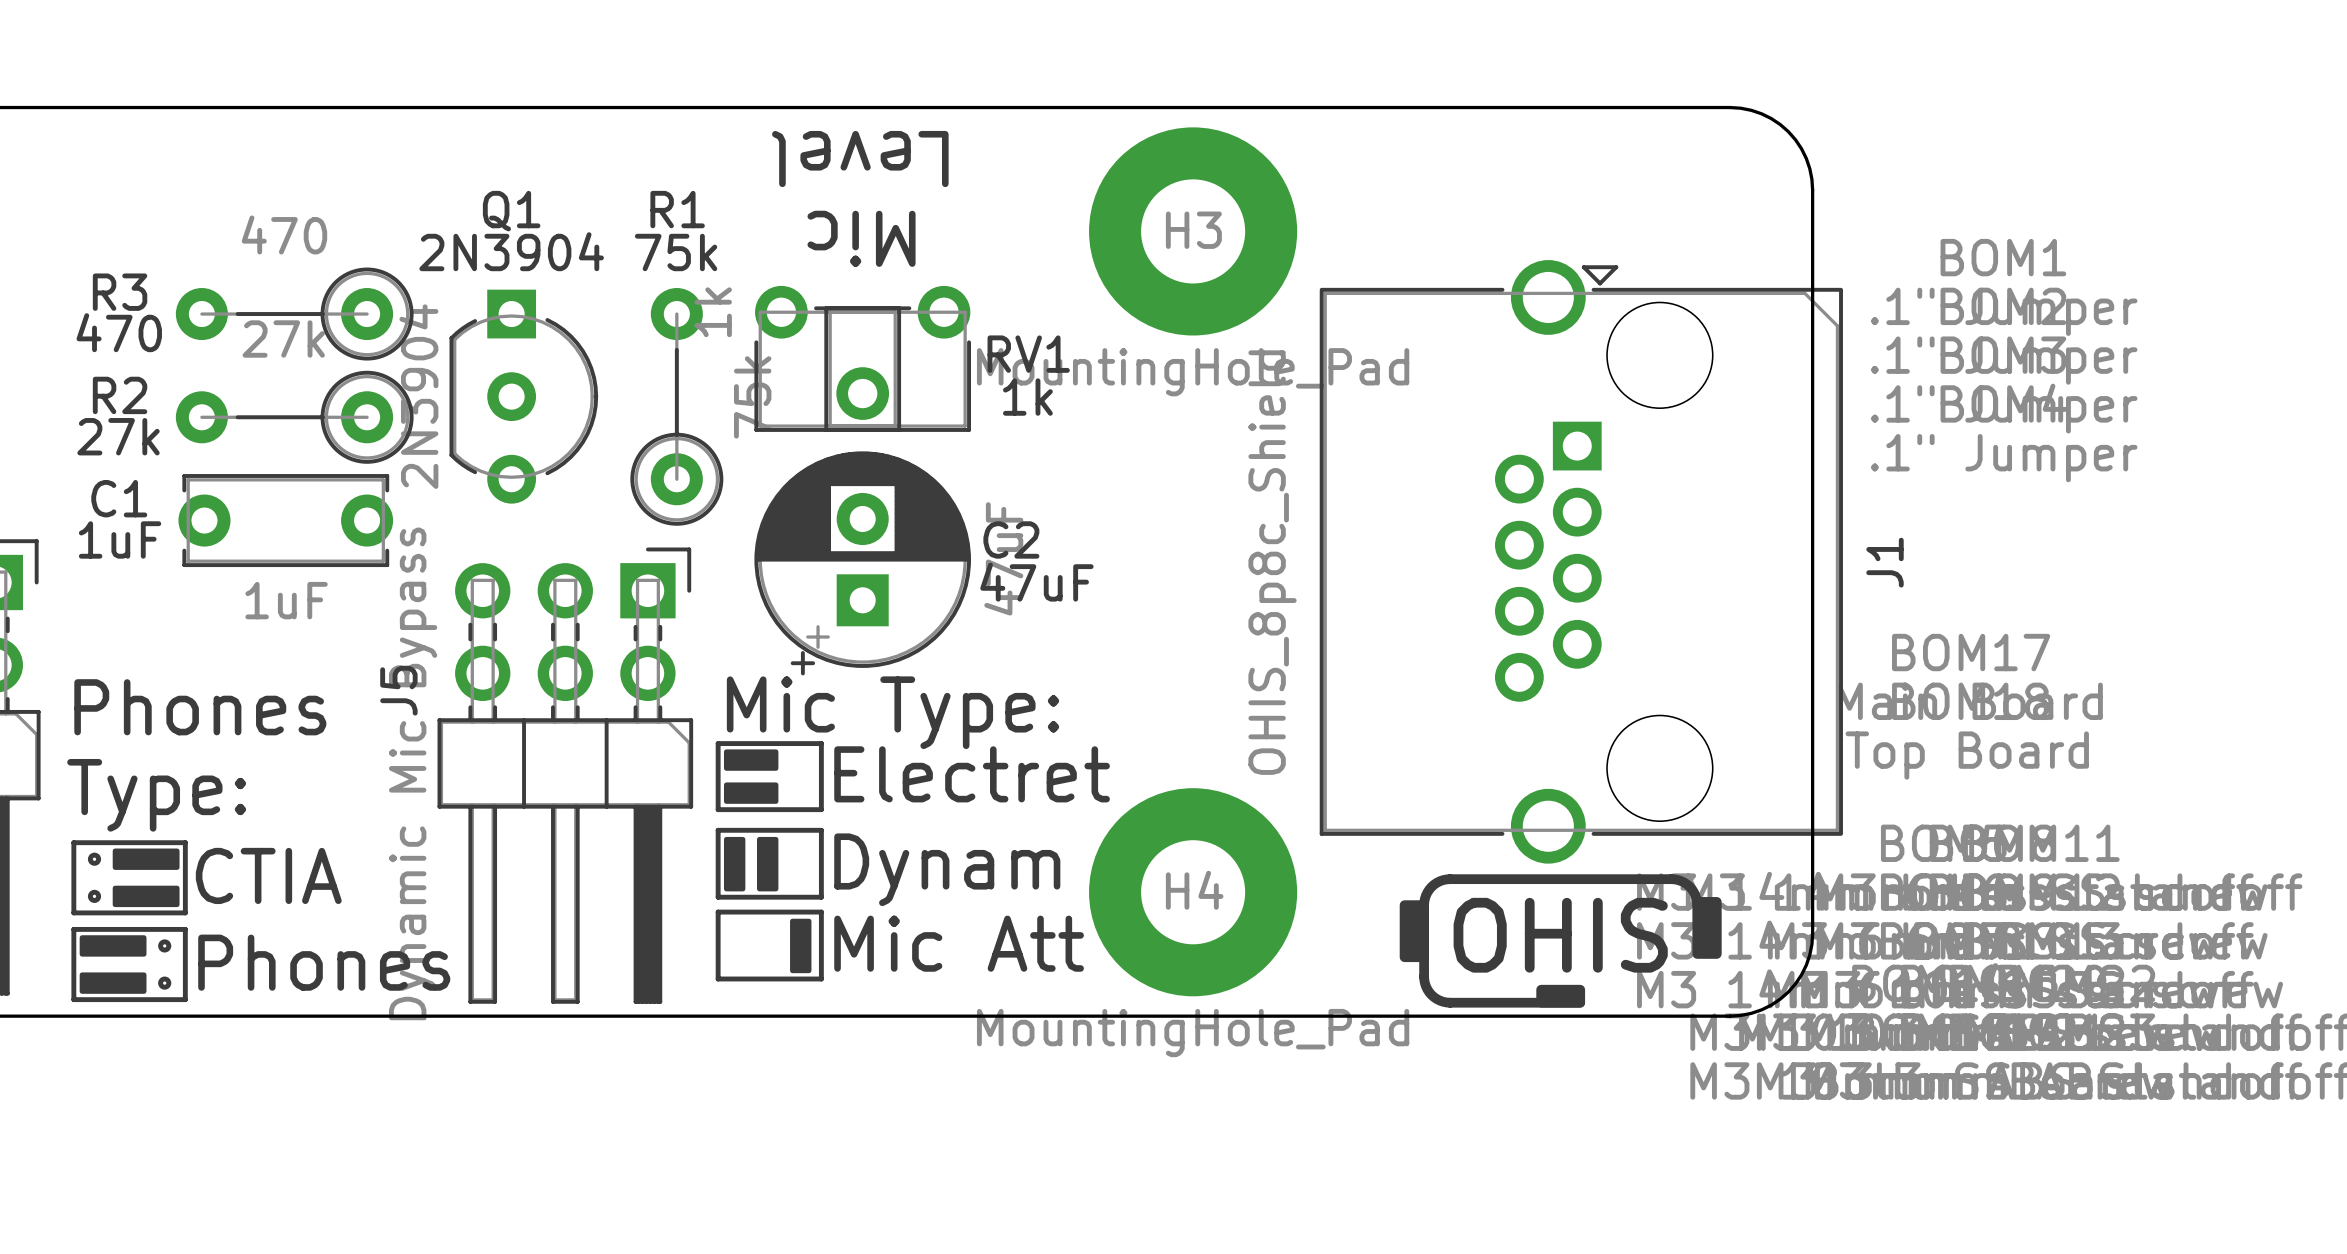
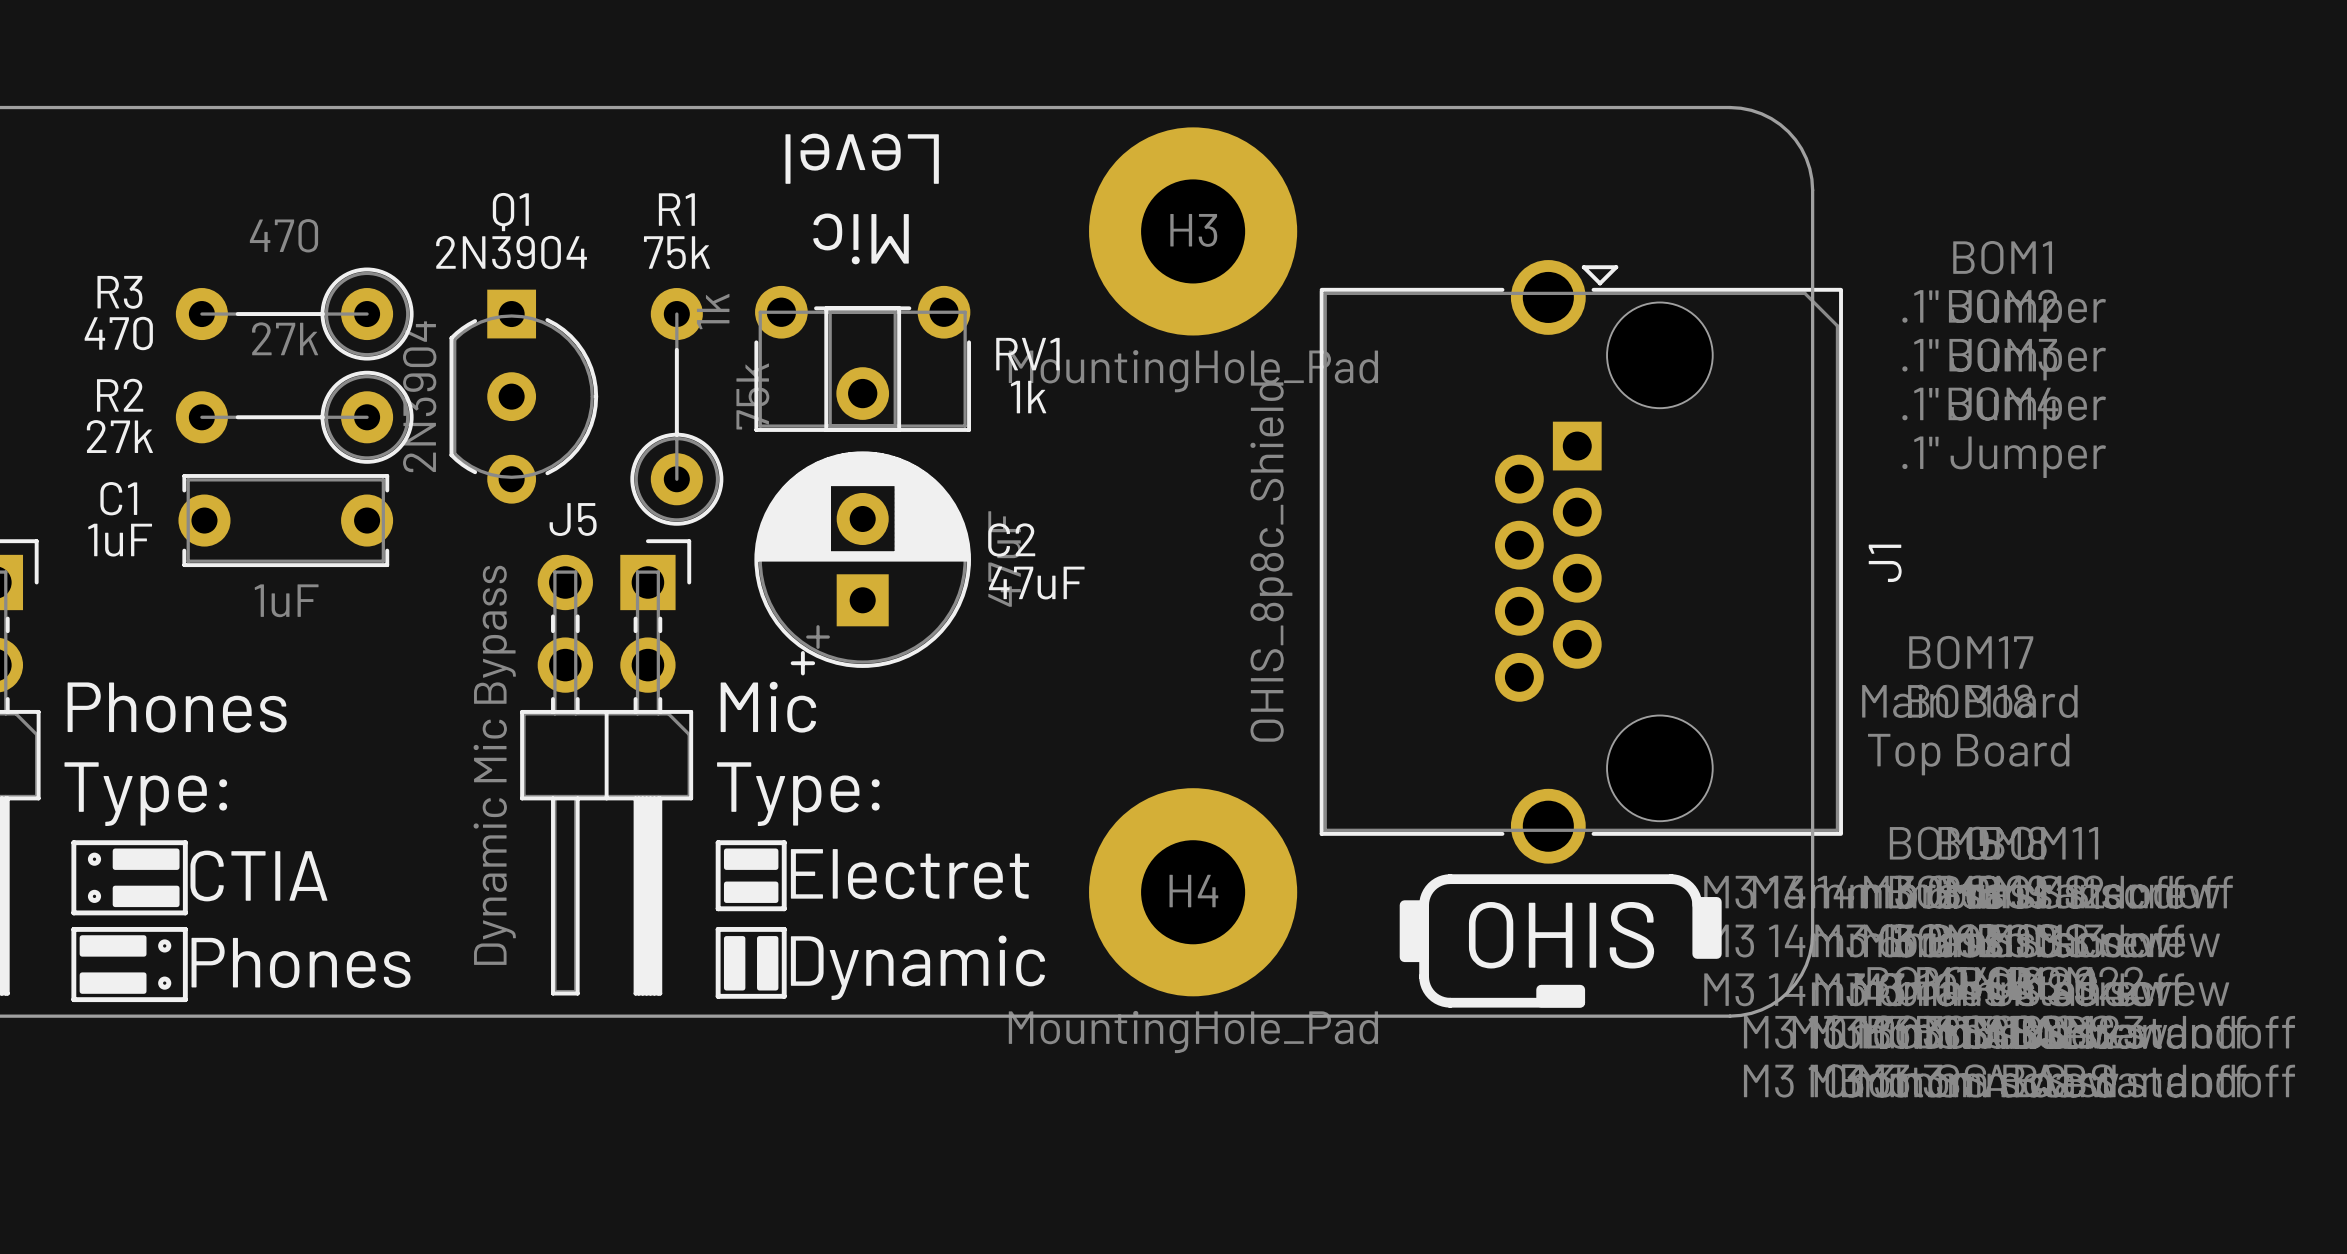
J5 footprint: [437, 547, 694, 1004] -> [520, 539, 694, 996]
J5 name position: J5 (398, 690) -> J5 (573, 519)
text: Mic Type: (893, 712) -> Mic (768, 707)
line: (718, 743) (718, 809) (821, 809) (821, 743) (718, 743) -> none
drawing: [723, 749, 812, 974] -> none
text position: Electret (972, 774) -> Electret (909, 874)
text: none -> Type: (798, 794)
line: (718, 842) (718, 830) (821, 830) (821, 897) (718, 897) -> (718, 842) (784, 842) (784, 908) (718, 908) (718, 897)
drawing: none -> [723, 848, 779, 991]
text: Dynam (947, 869) -> Dynamic (917, 967)
line: (718, 929) (718, 912) (821, 912) (821, 978) (718, 978) -> (718, 929) (784, 929) (784, 996) (718, 996) (718, 978)
text: Mic Att (959, 943) -> none

